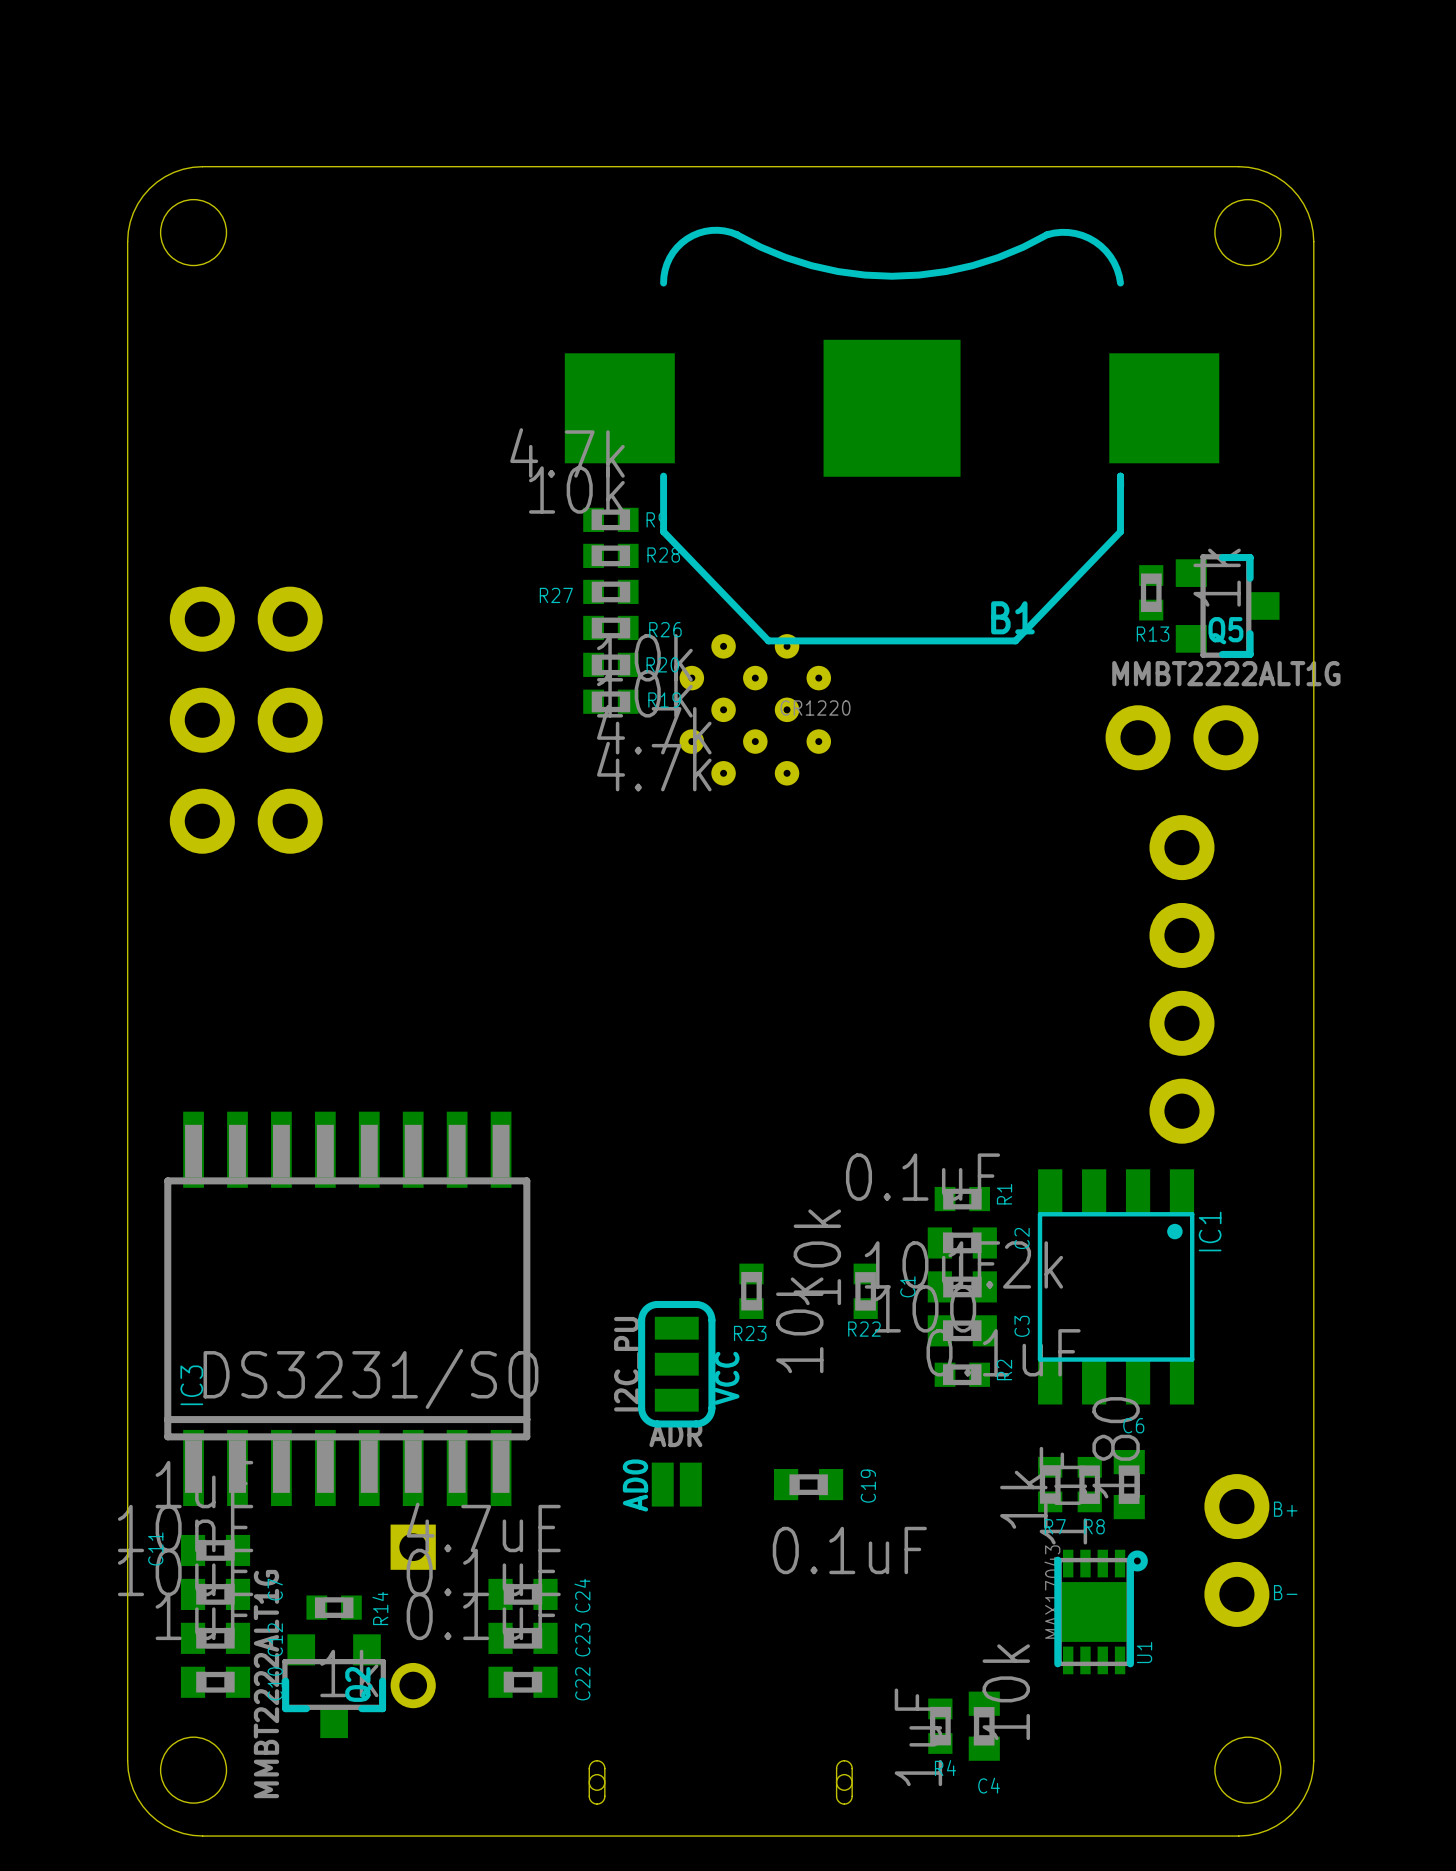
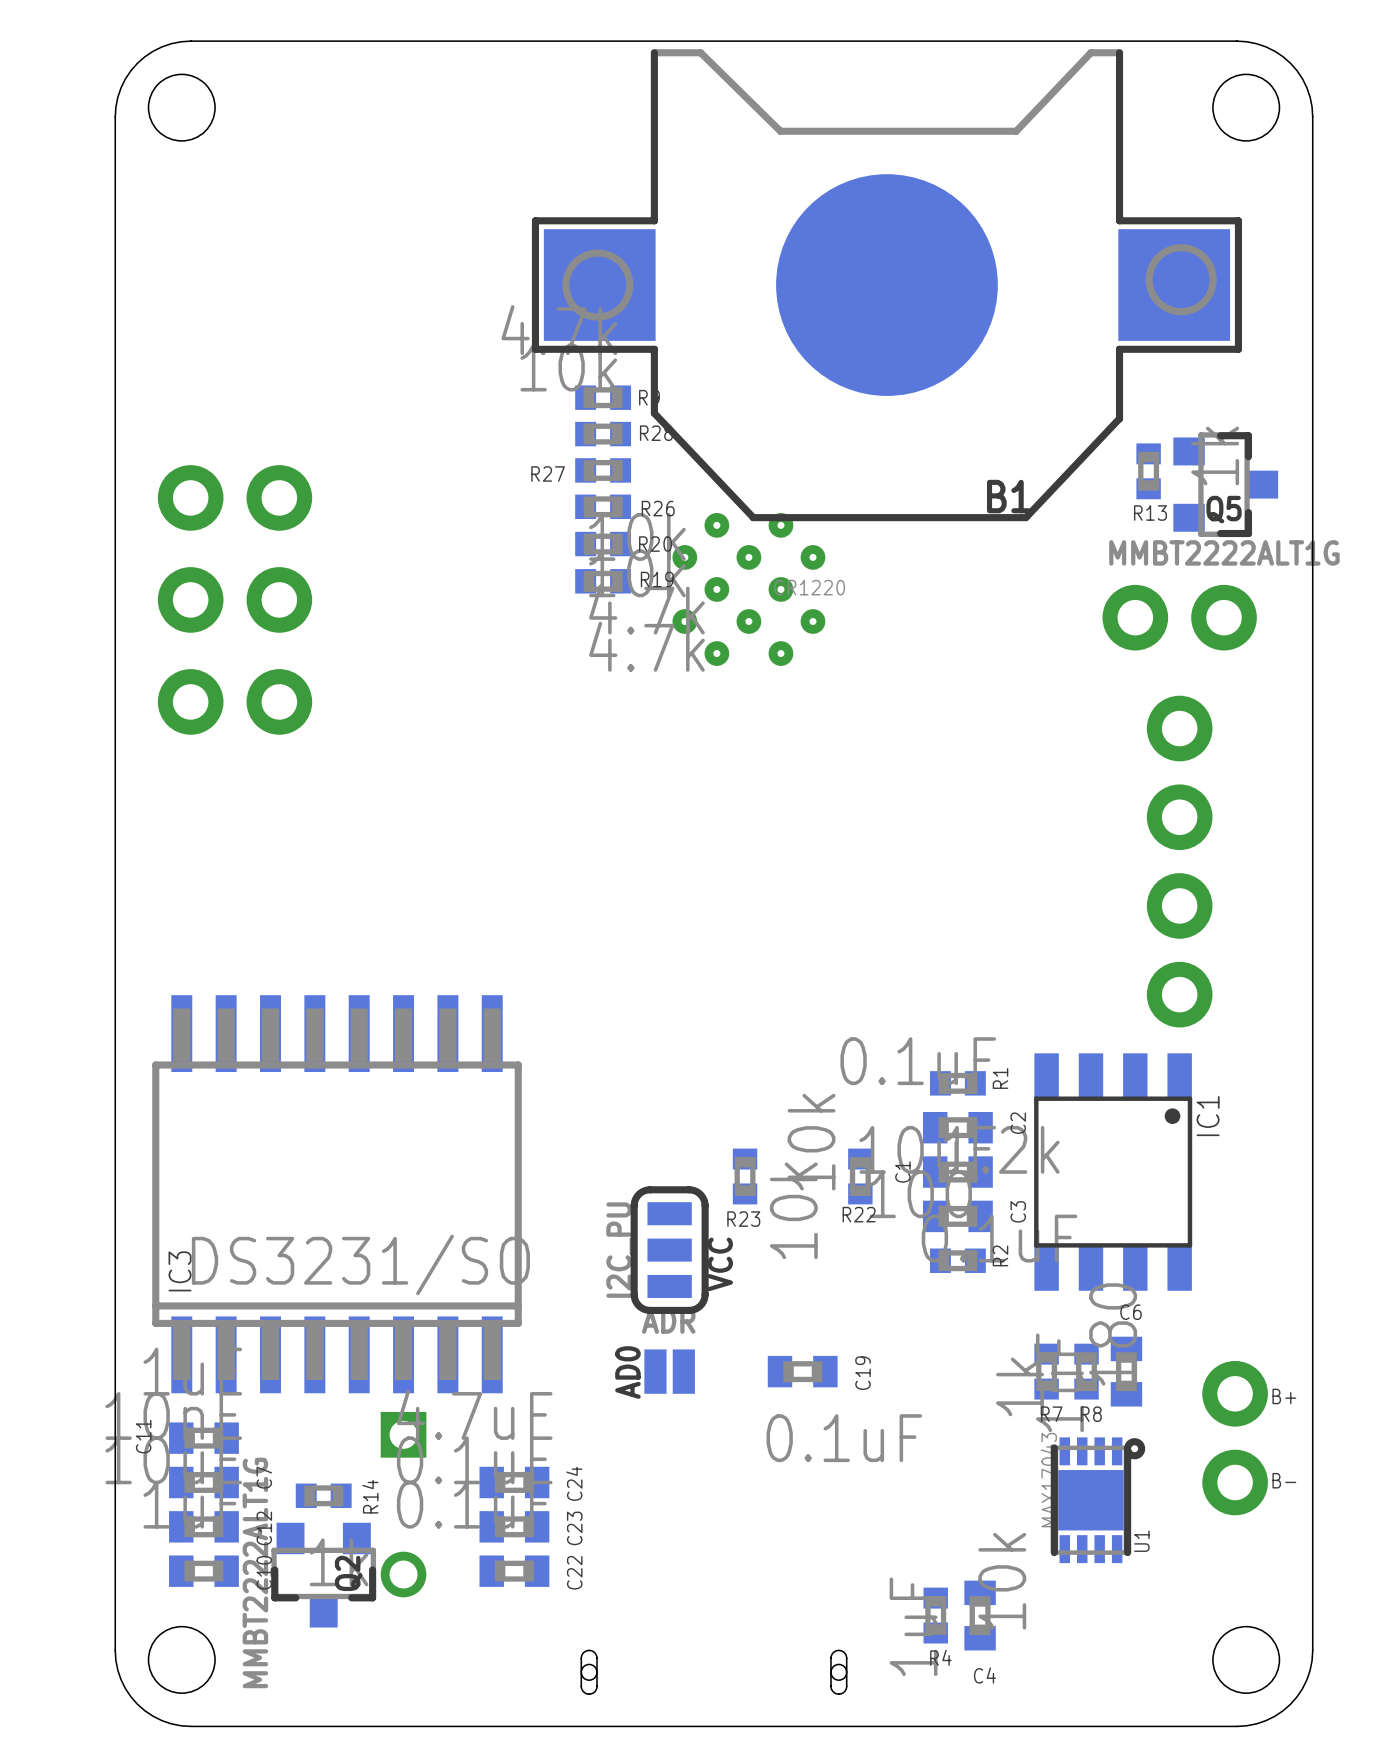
B1 footprint: [564, 226, 1220, 645] -> [531, 49, 1243, 522]

